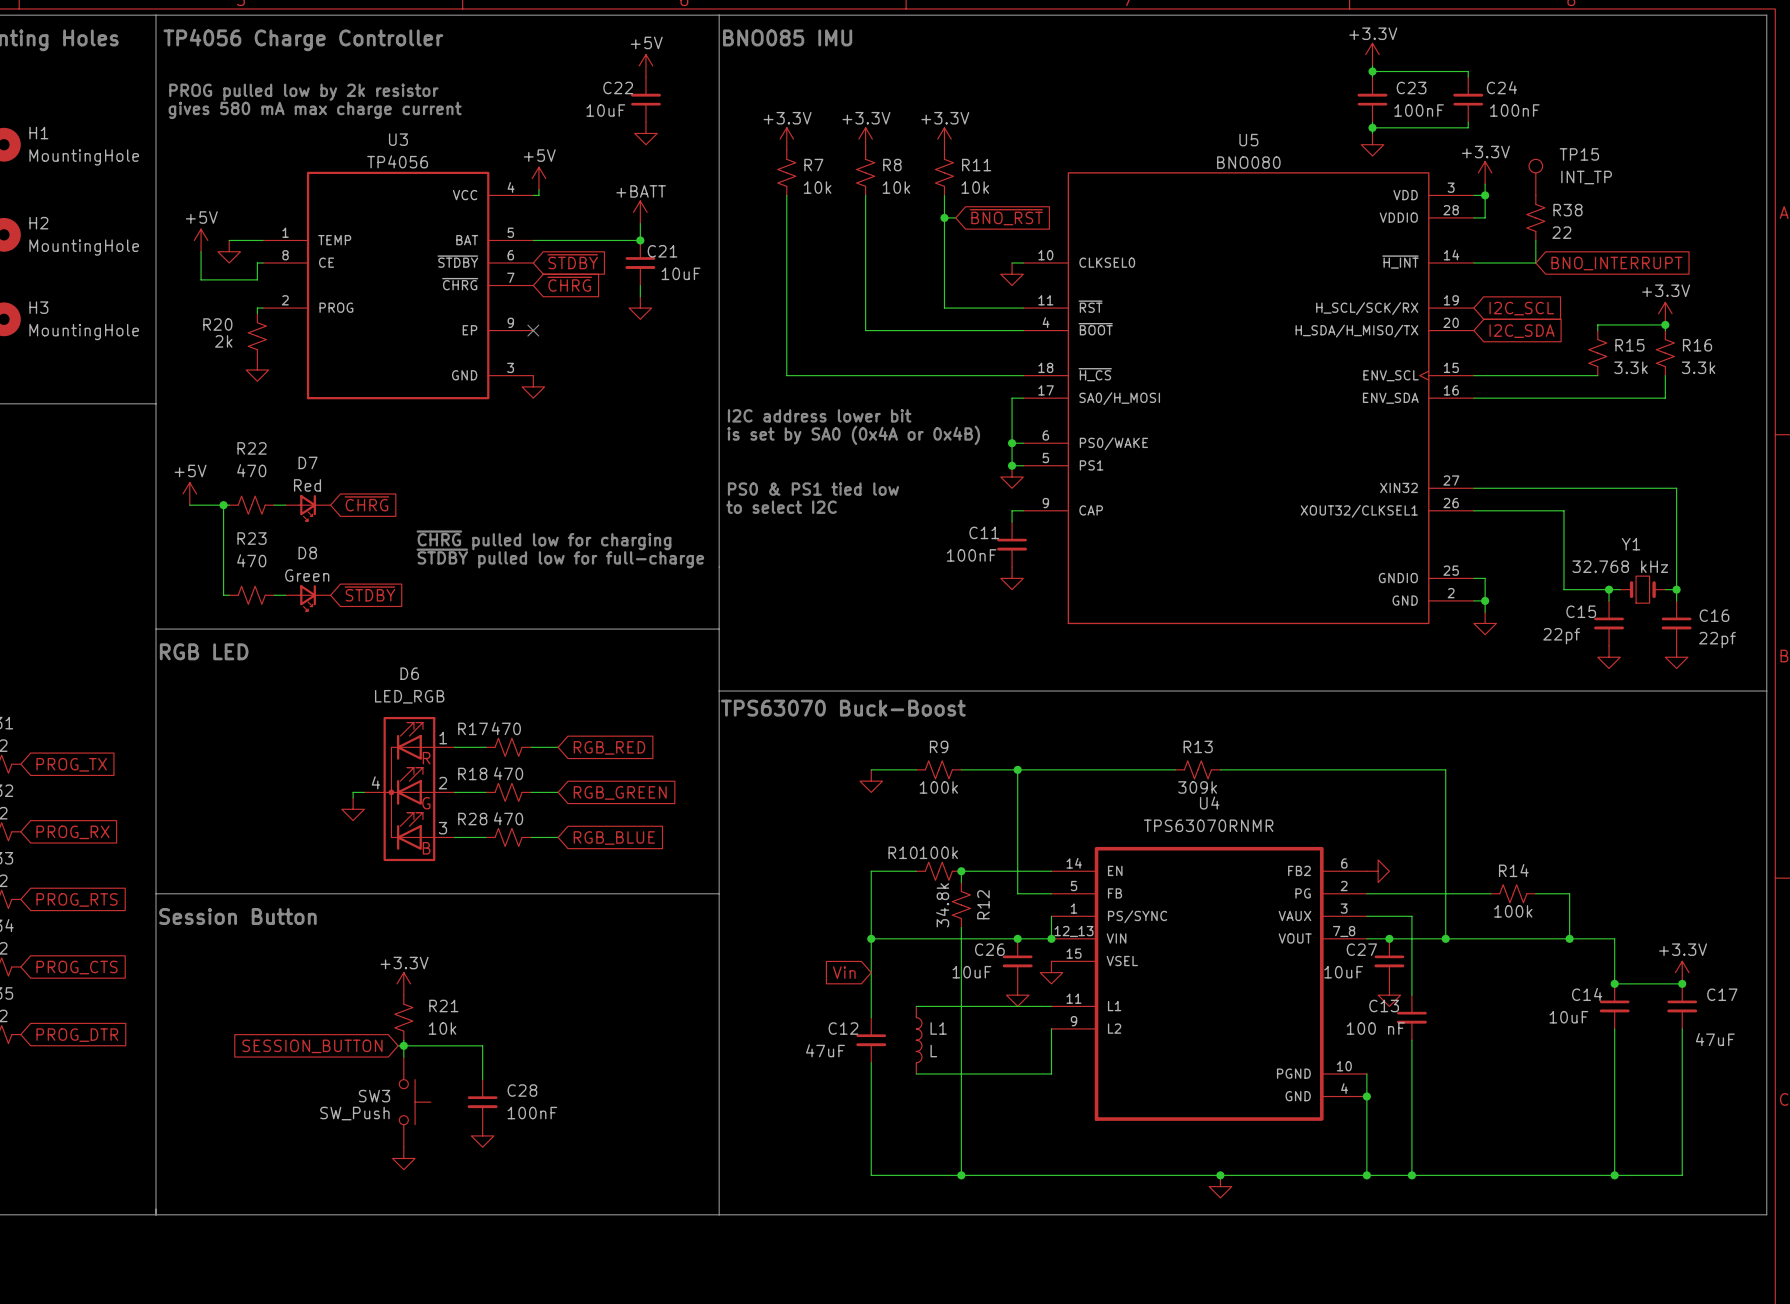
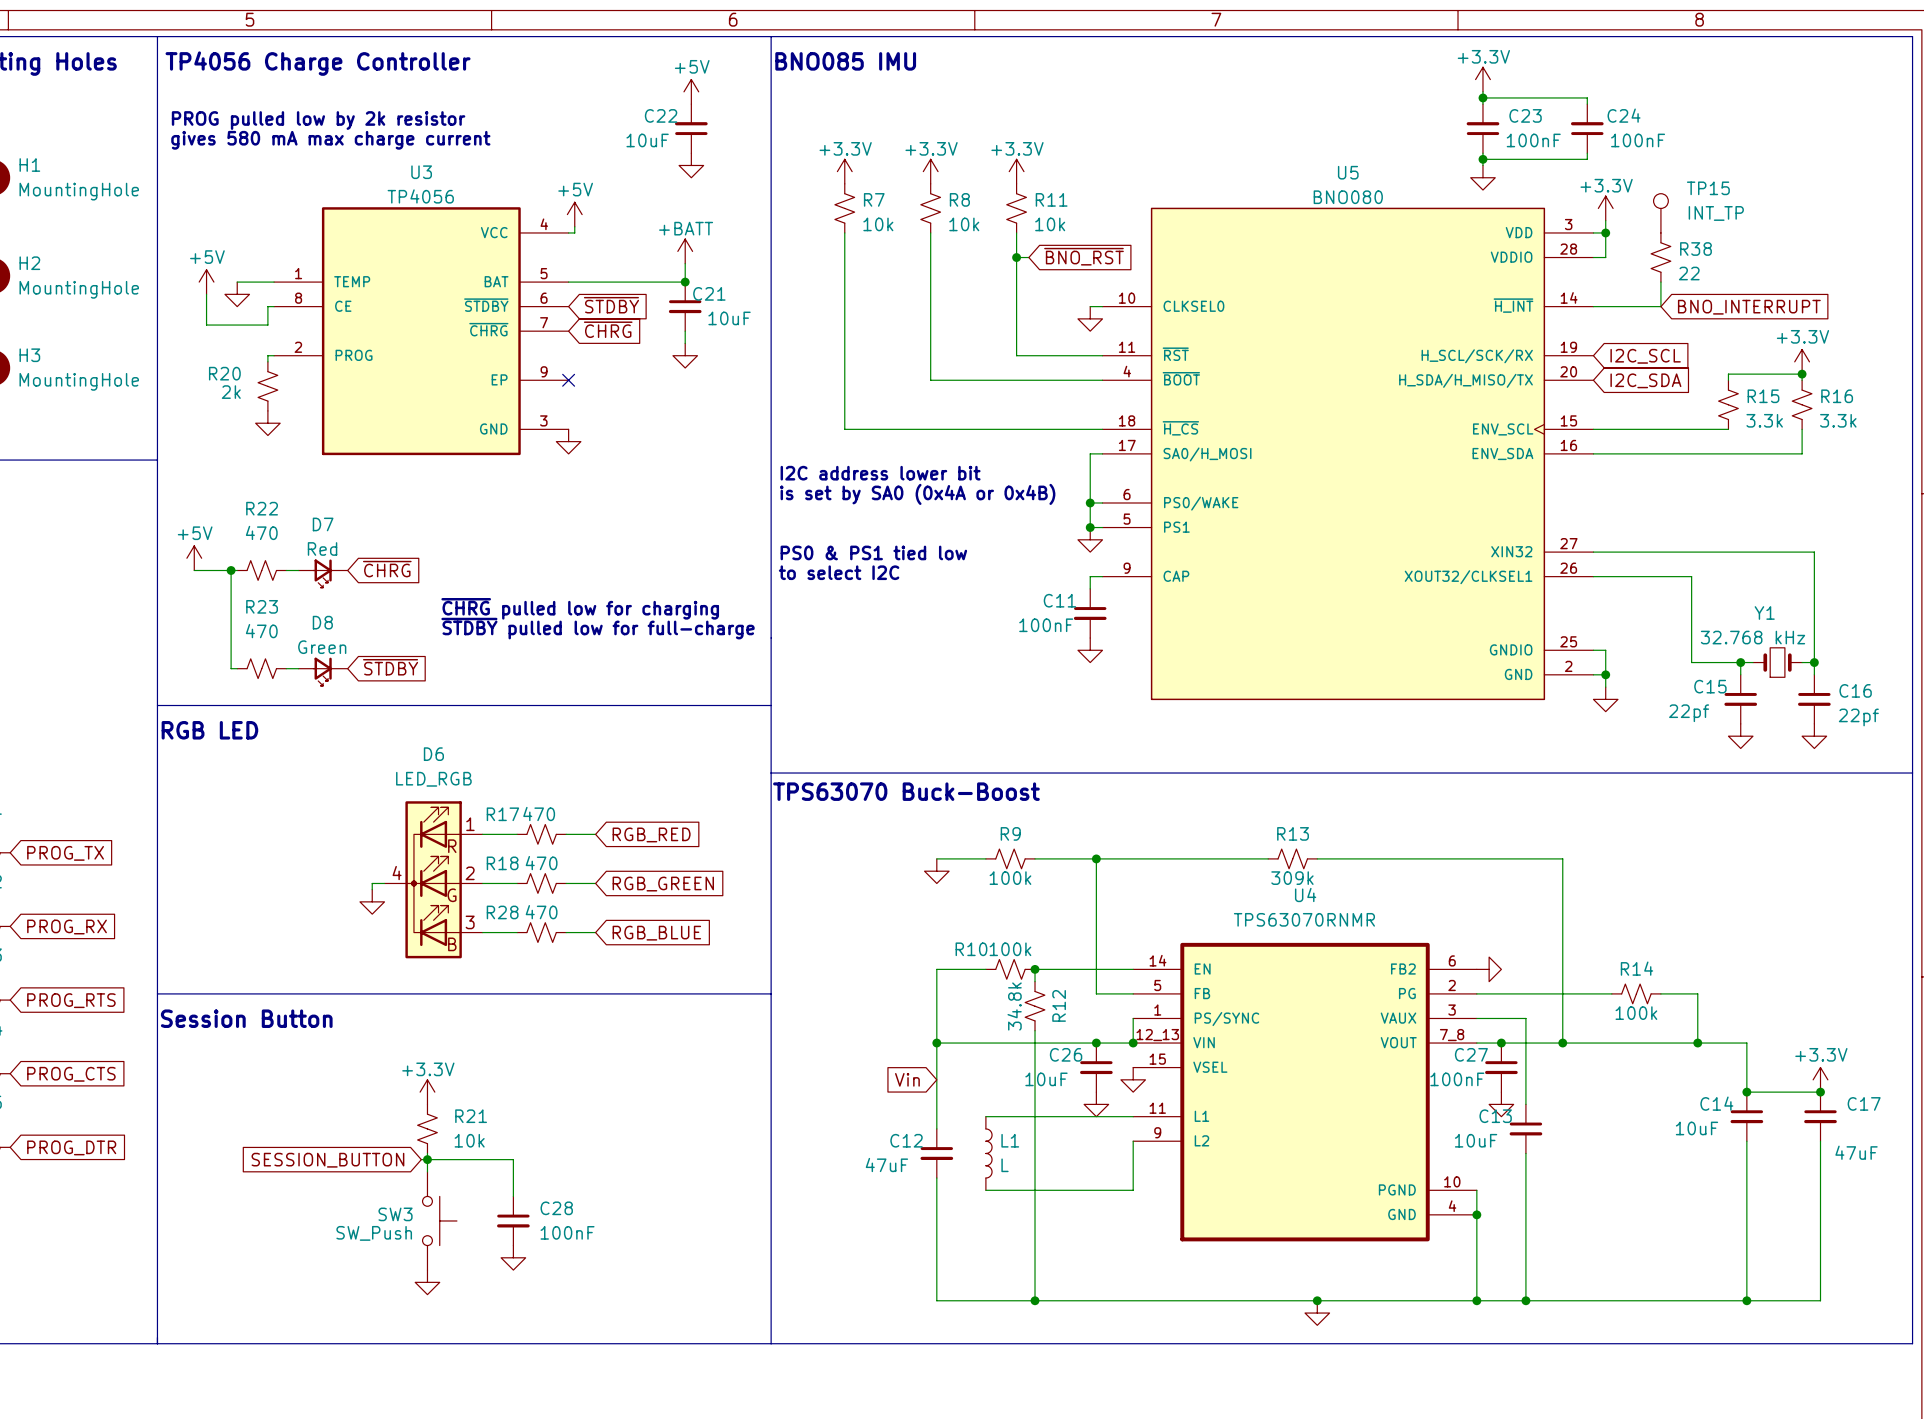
C27 value: 10uF (1343, 972) -> 100nF (1457, 1079)
C13 value: 100 nF (1375, 1028) -> 10uF (1476, 1140)

